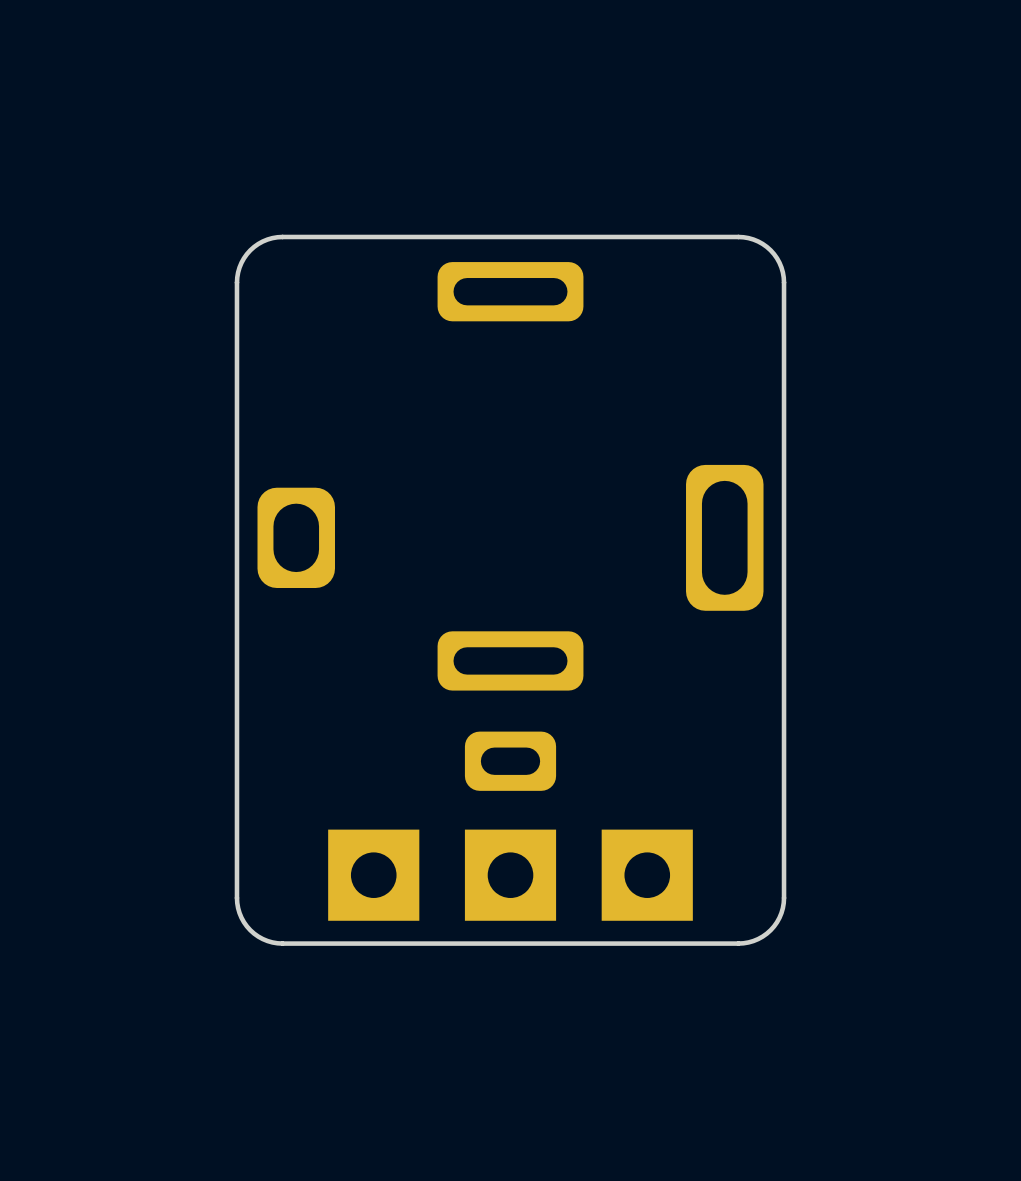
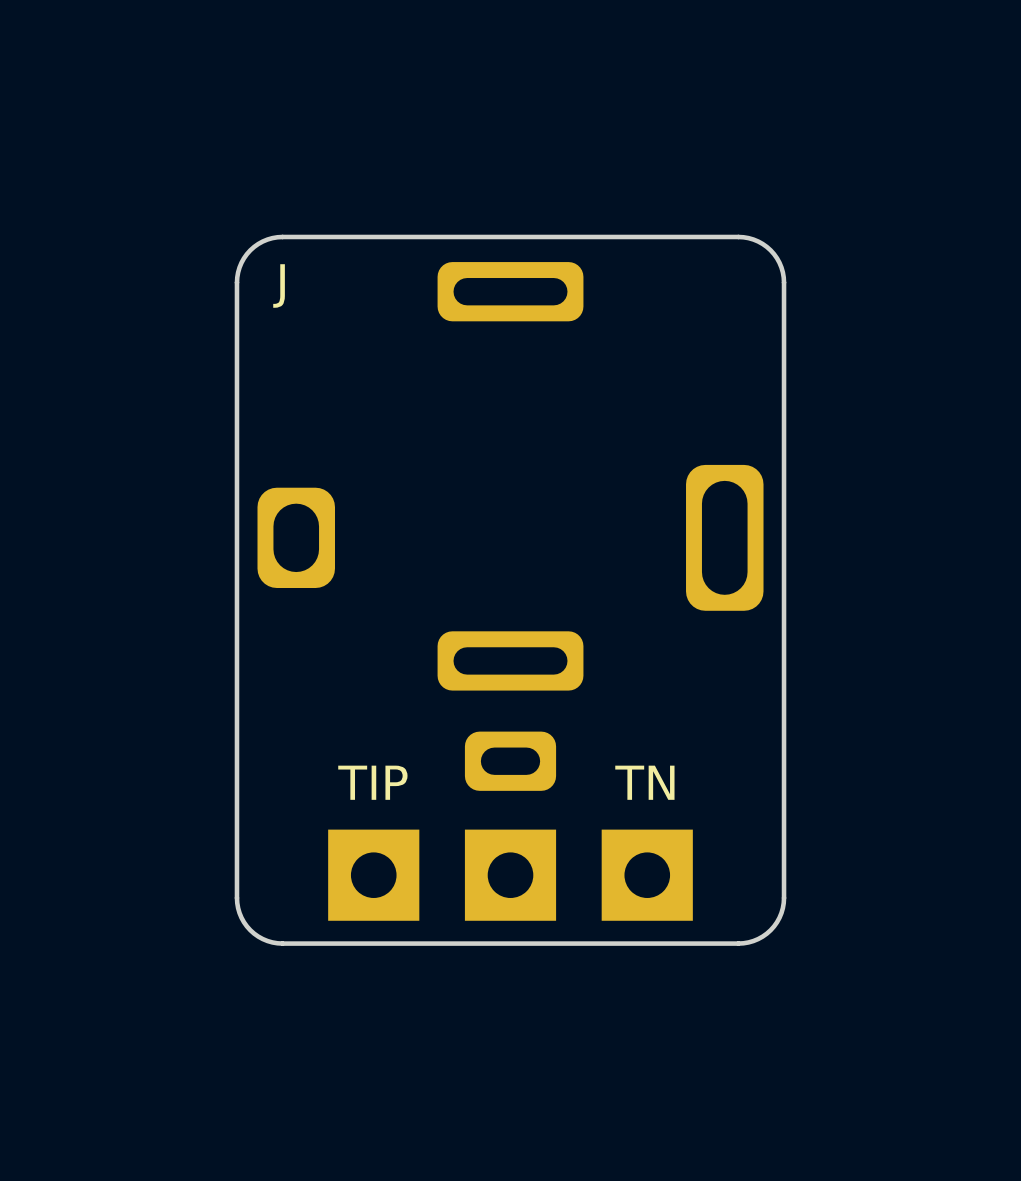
text: none -> J (279, 285)
text: none -> TIP (372, 782)
text: none -> TN (644, 782)

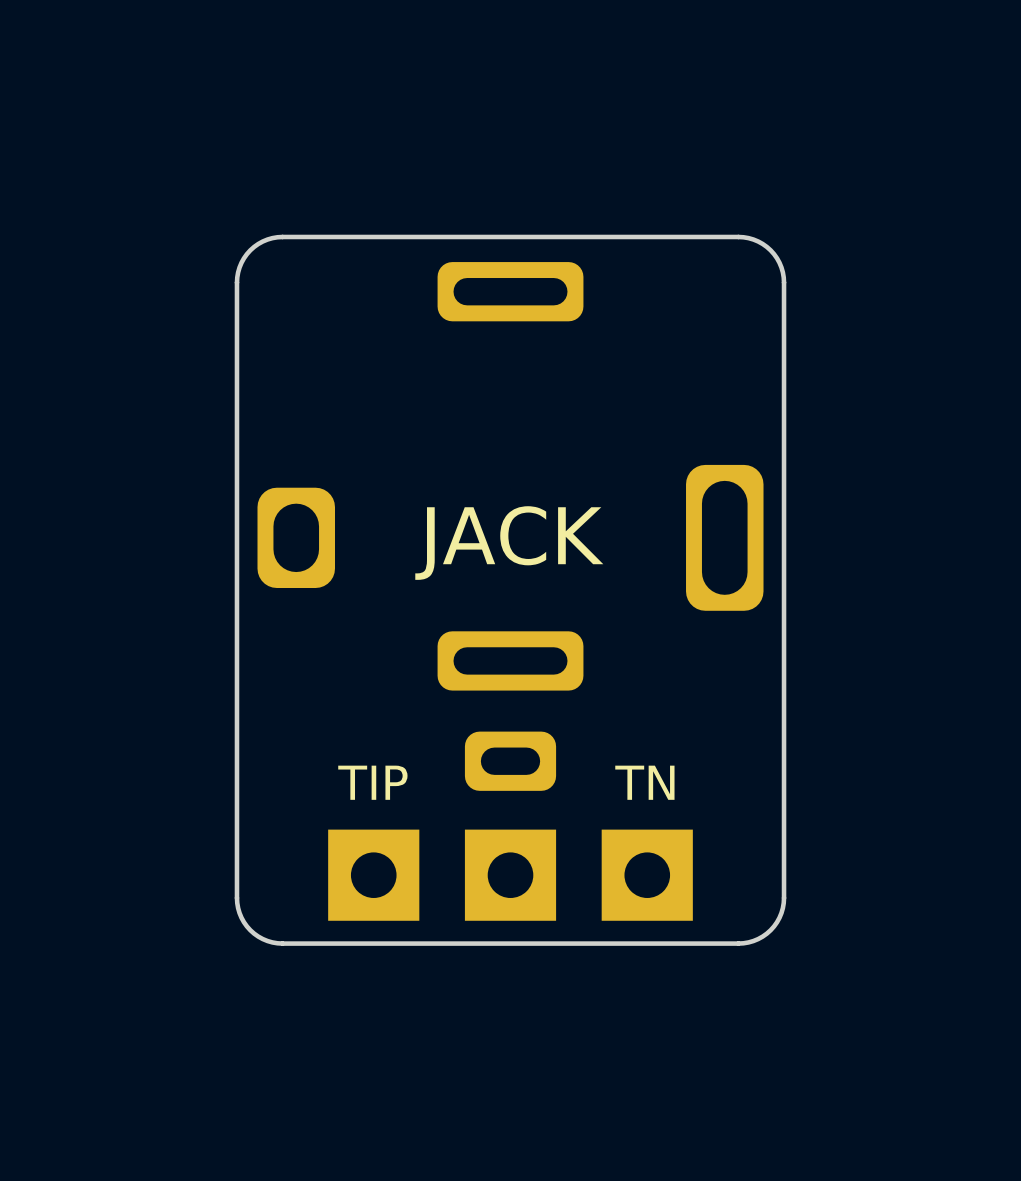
text: J (279, 285) -> none
text: none -> JACK (509, 543)

